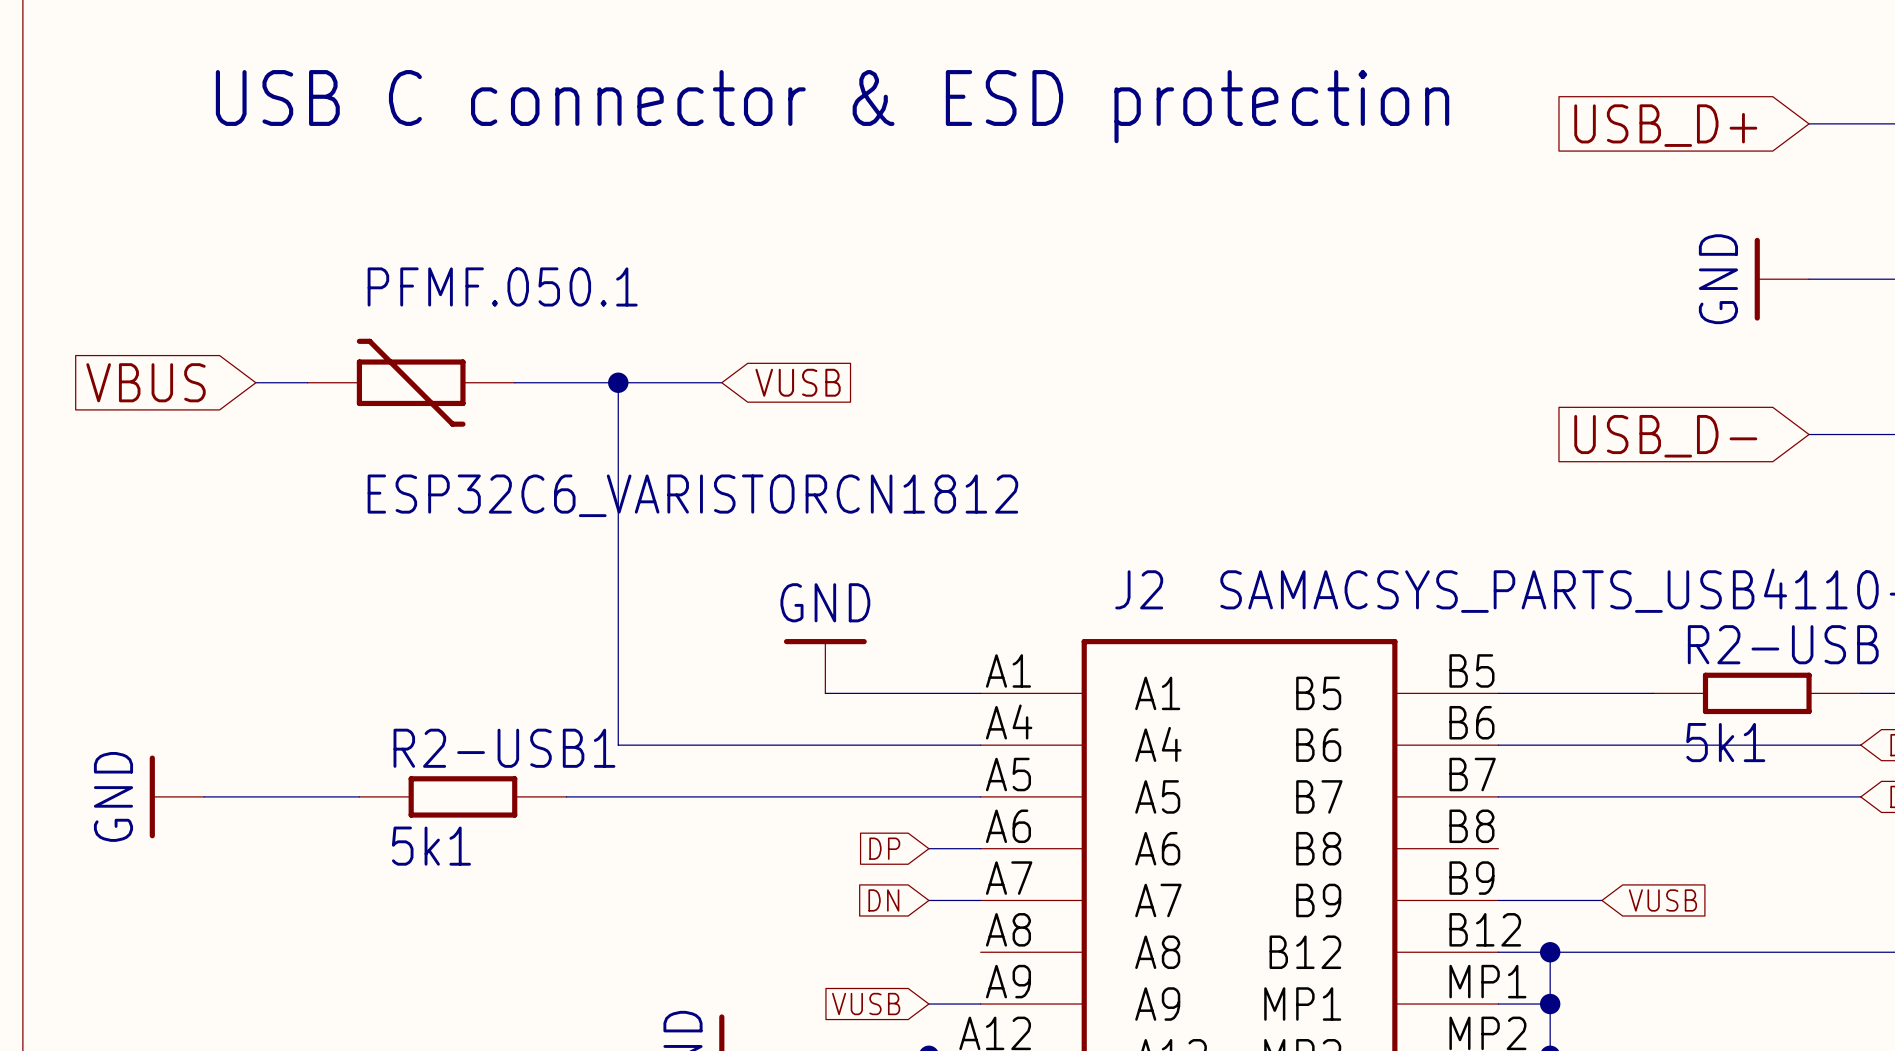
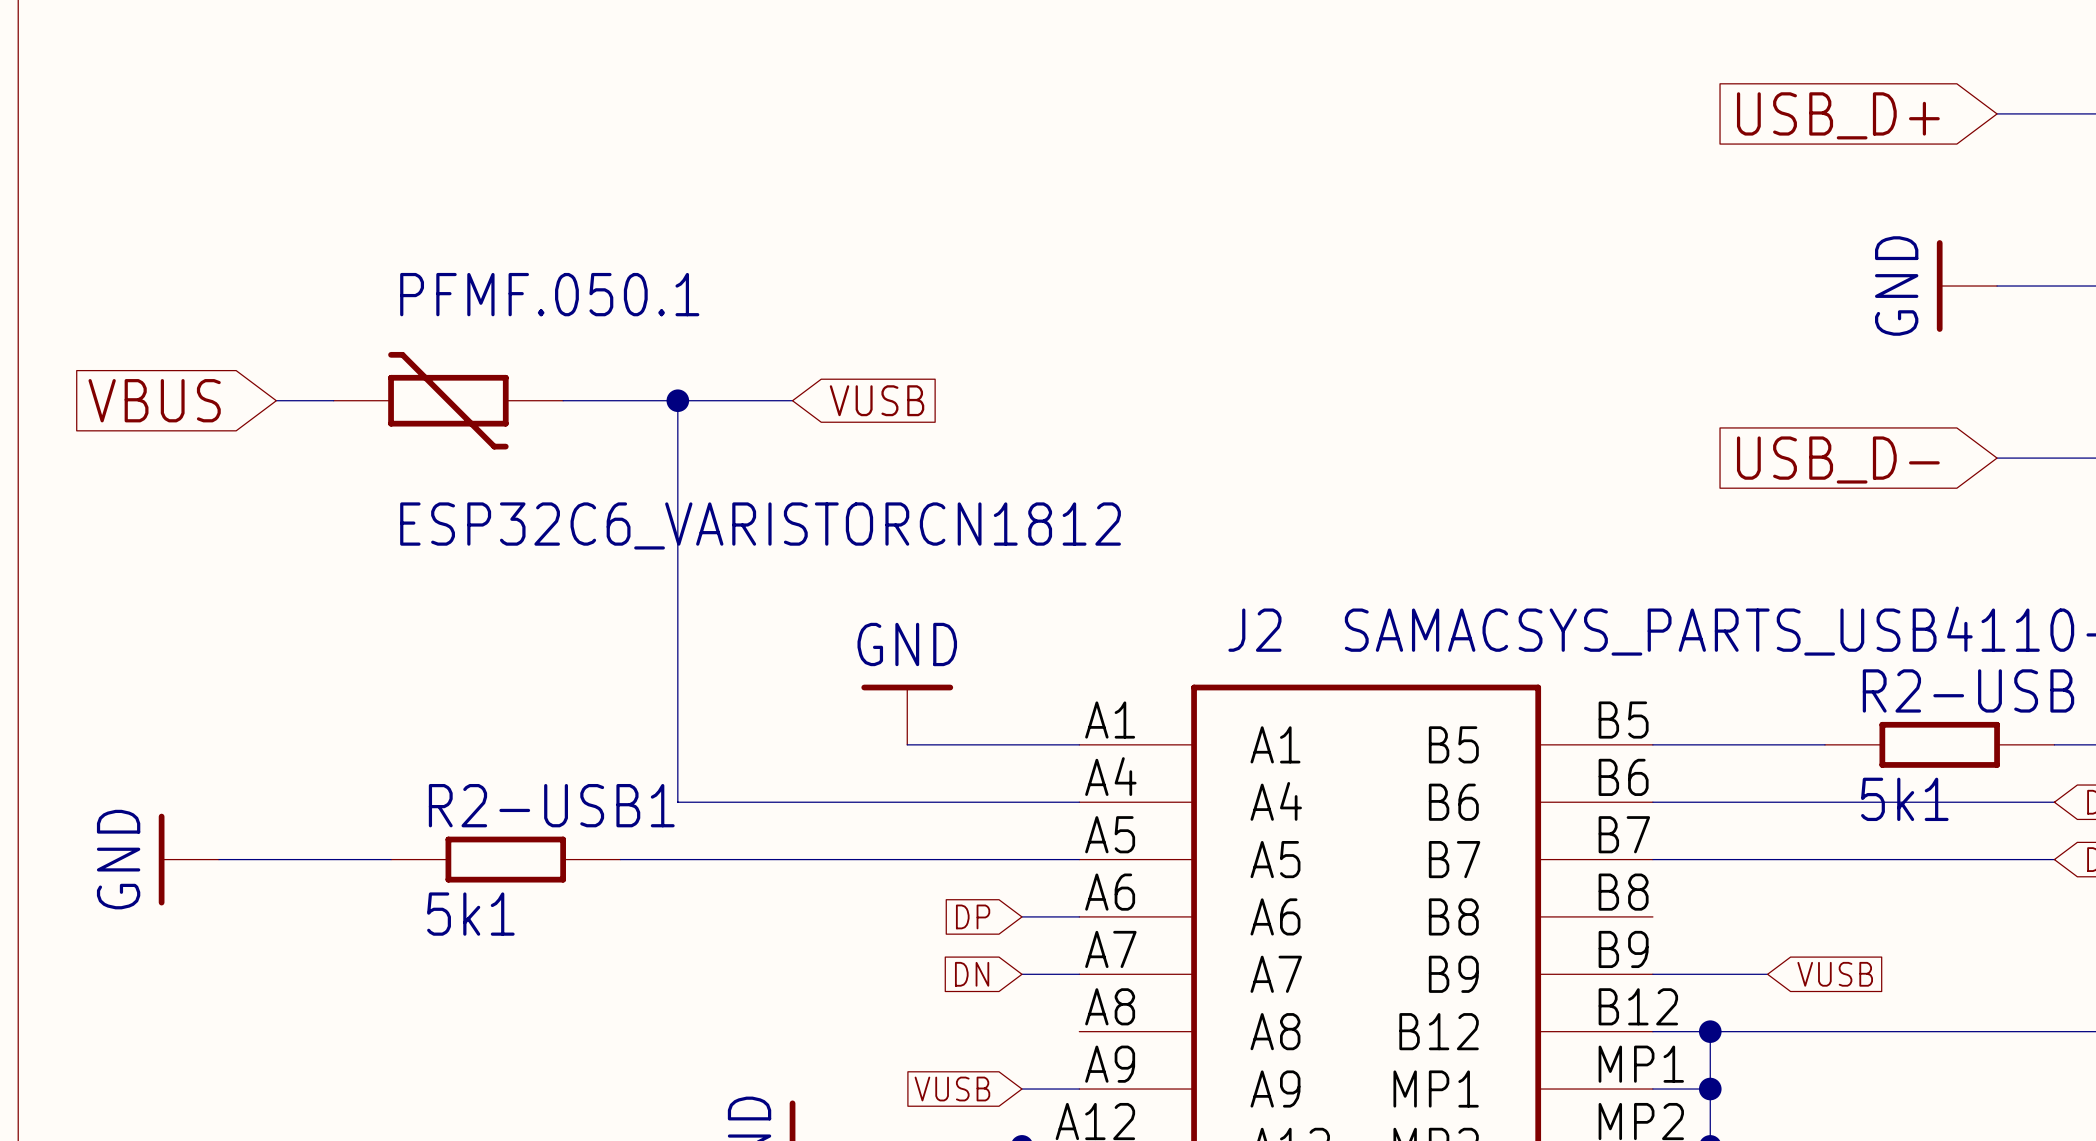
text: USB C connector & ESD protection (832, 106) -> none

